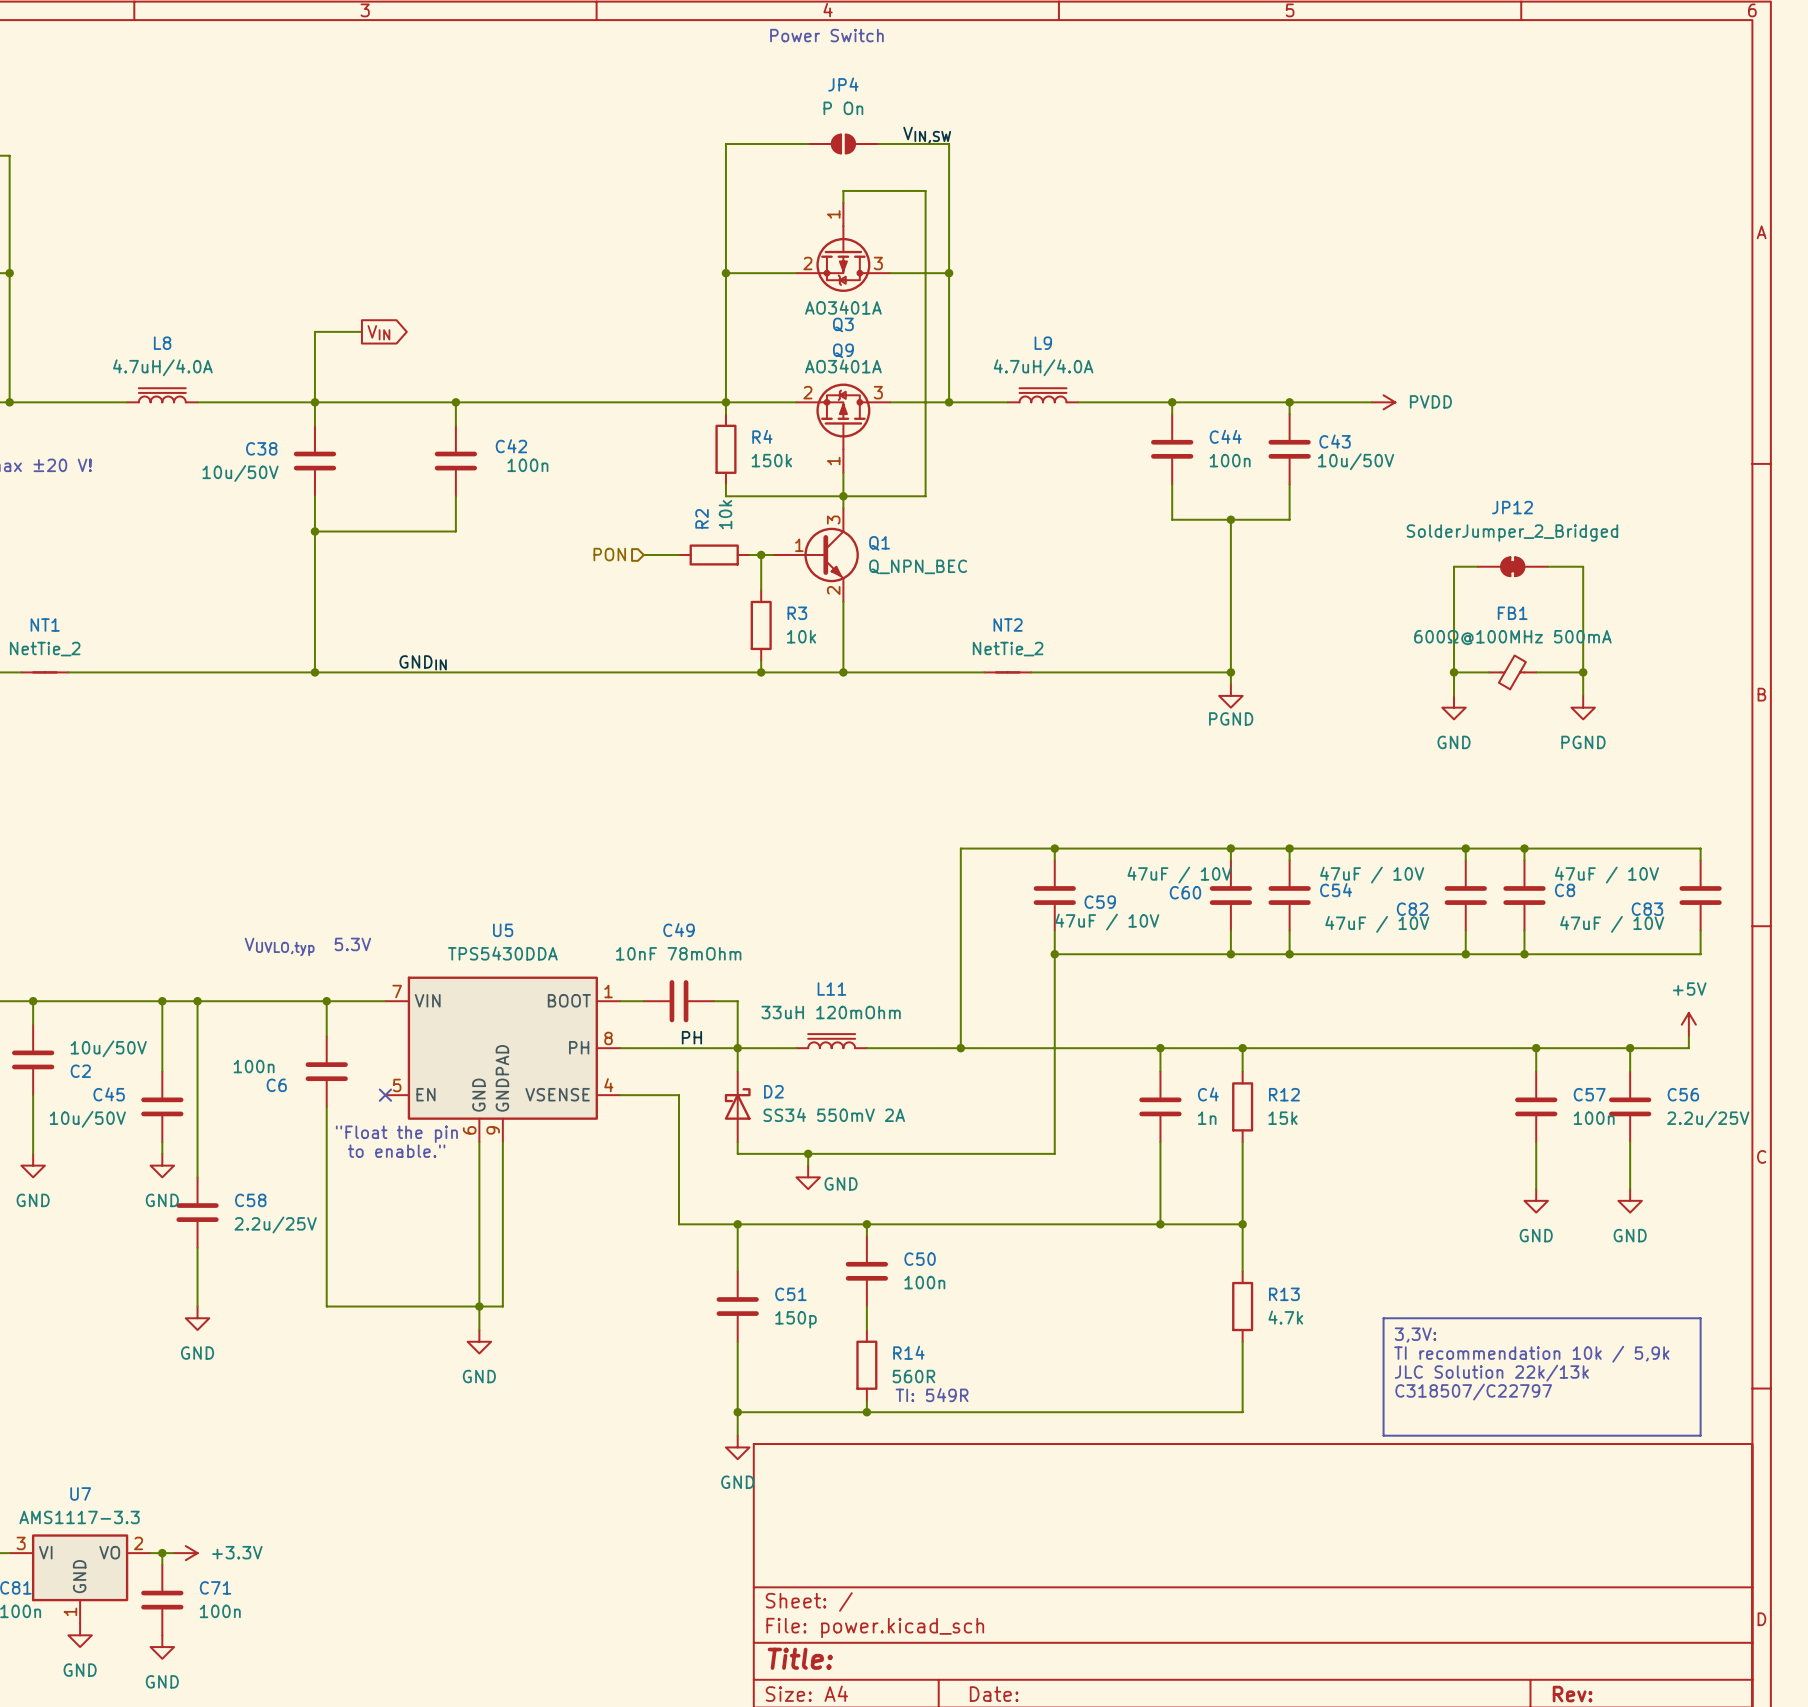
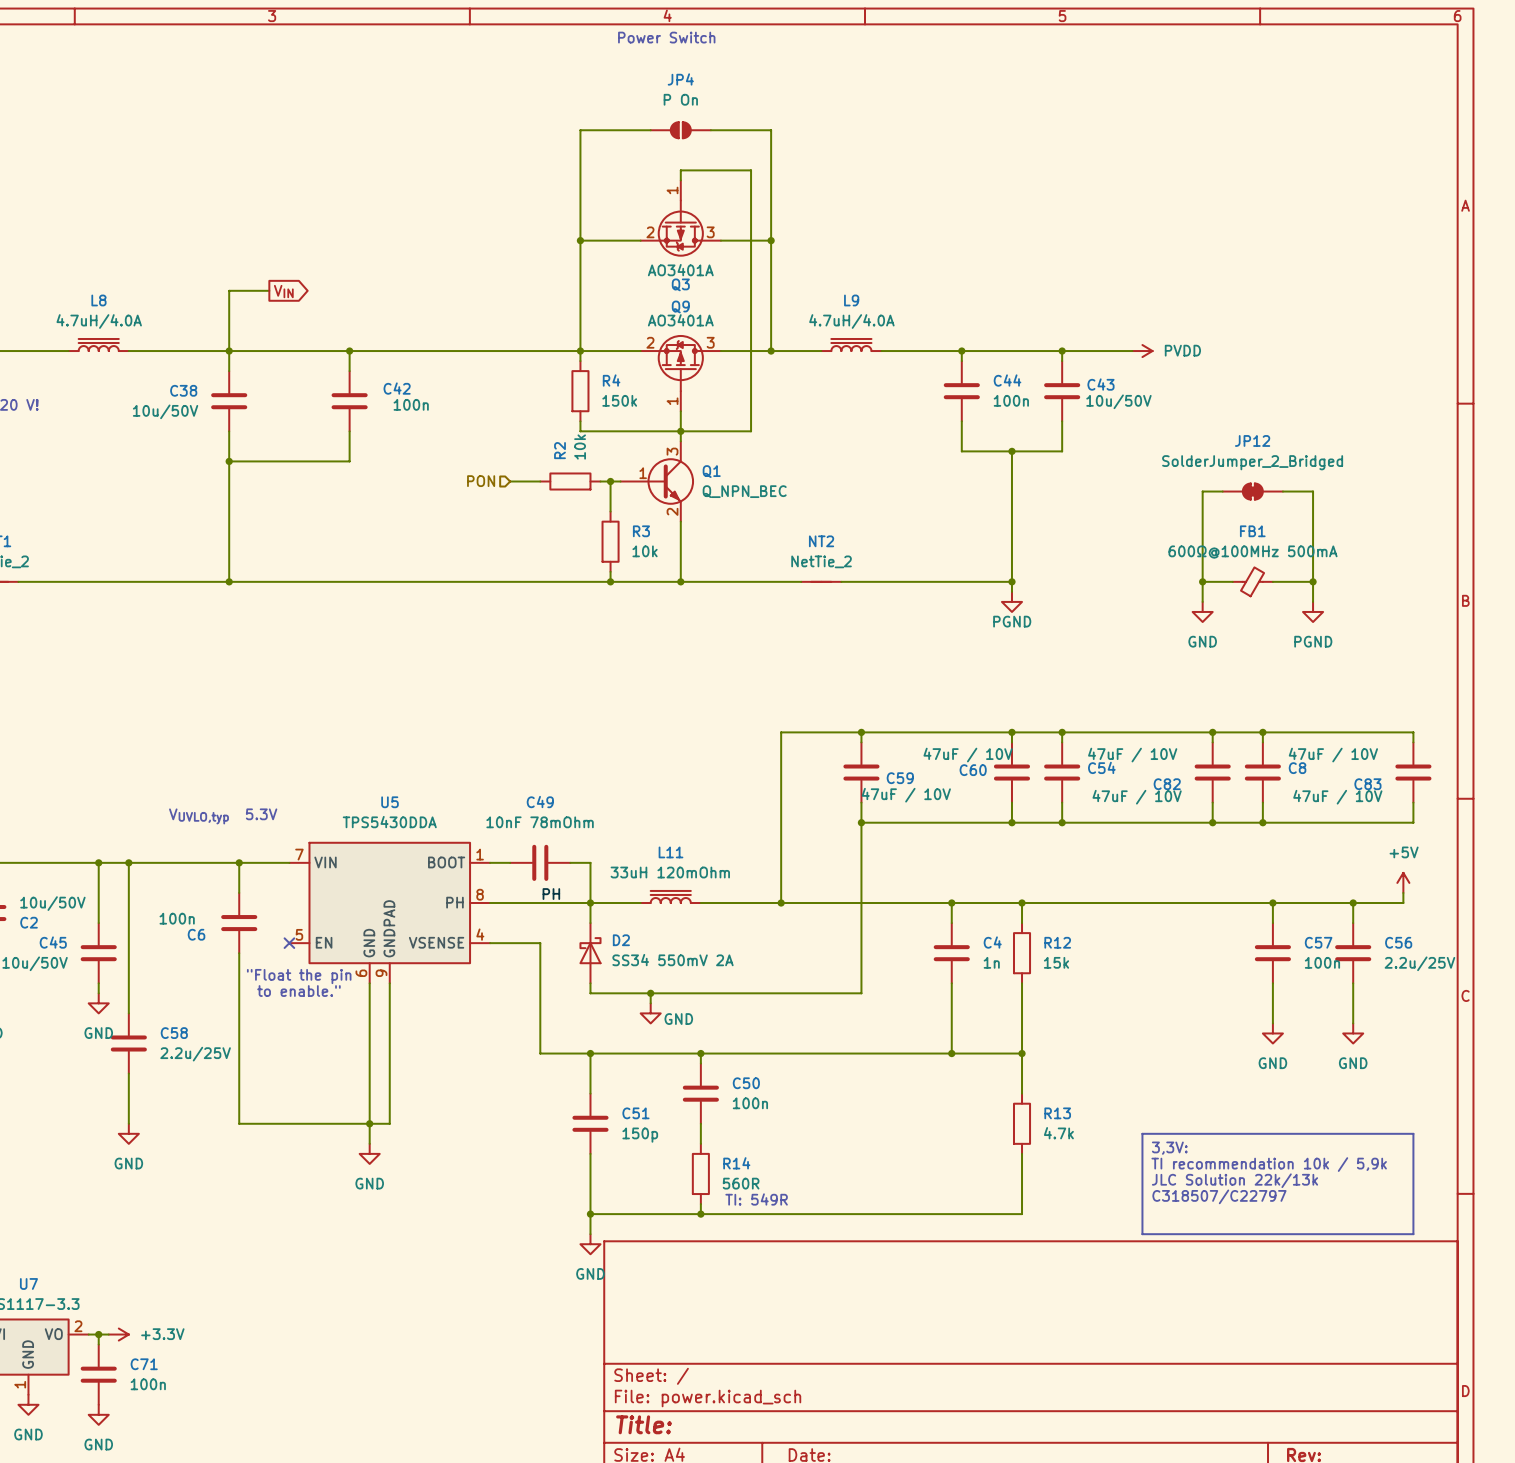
label: VIN,SW (927, 135) -> none
label: GNDIN (423, 662) -> none

